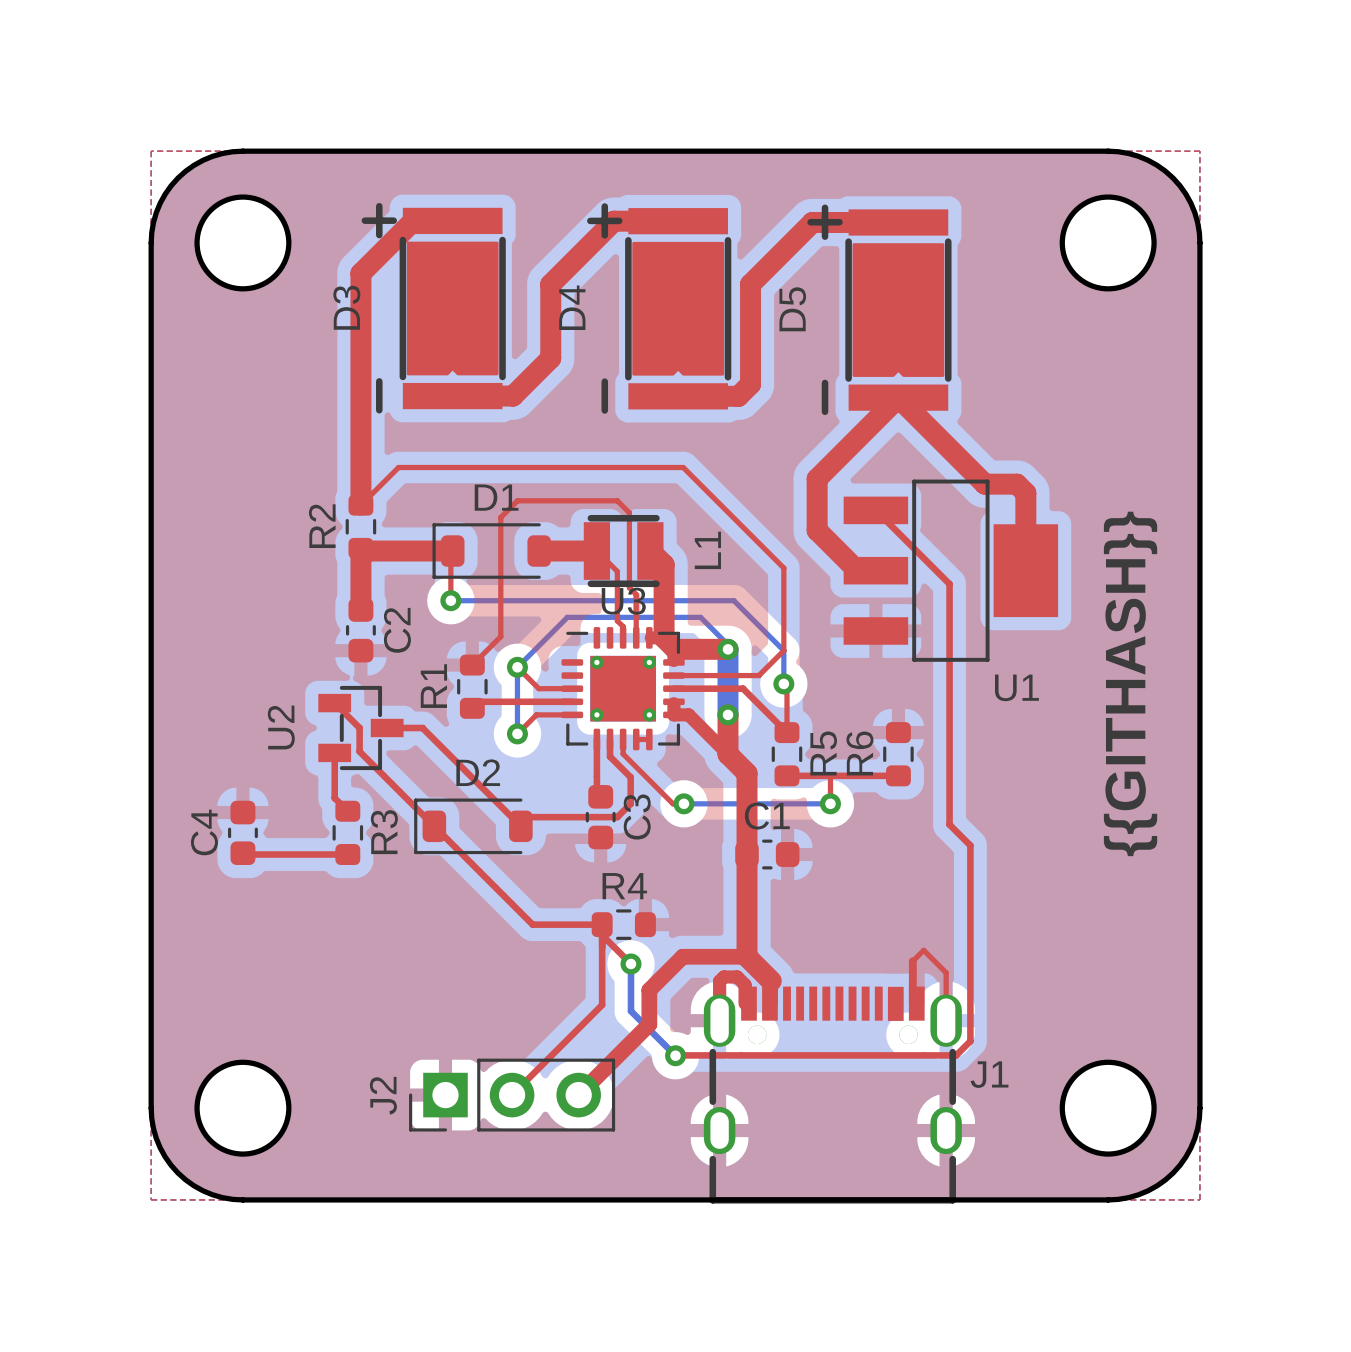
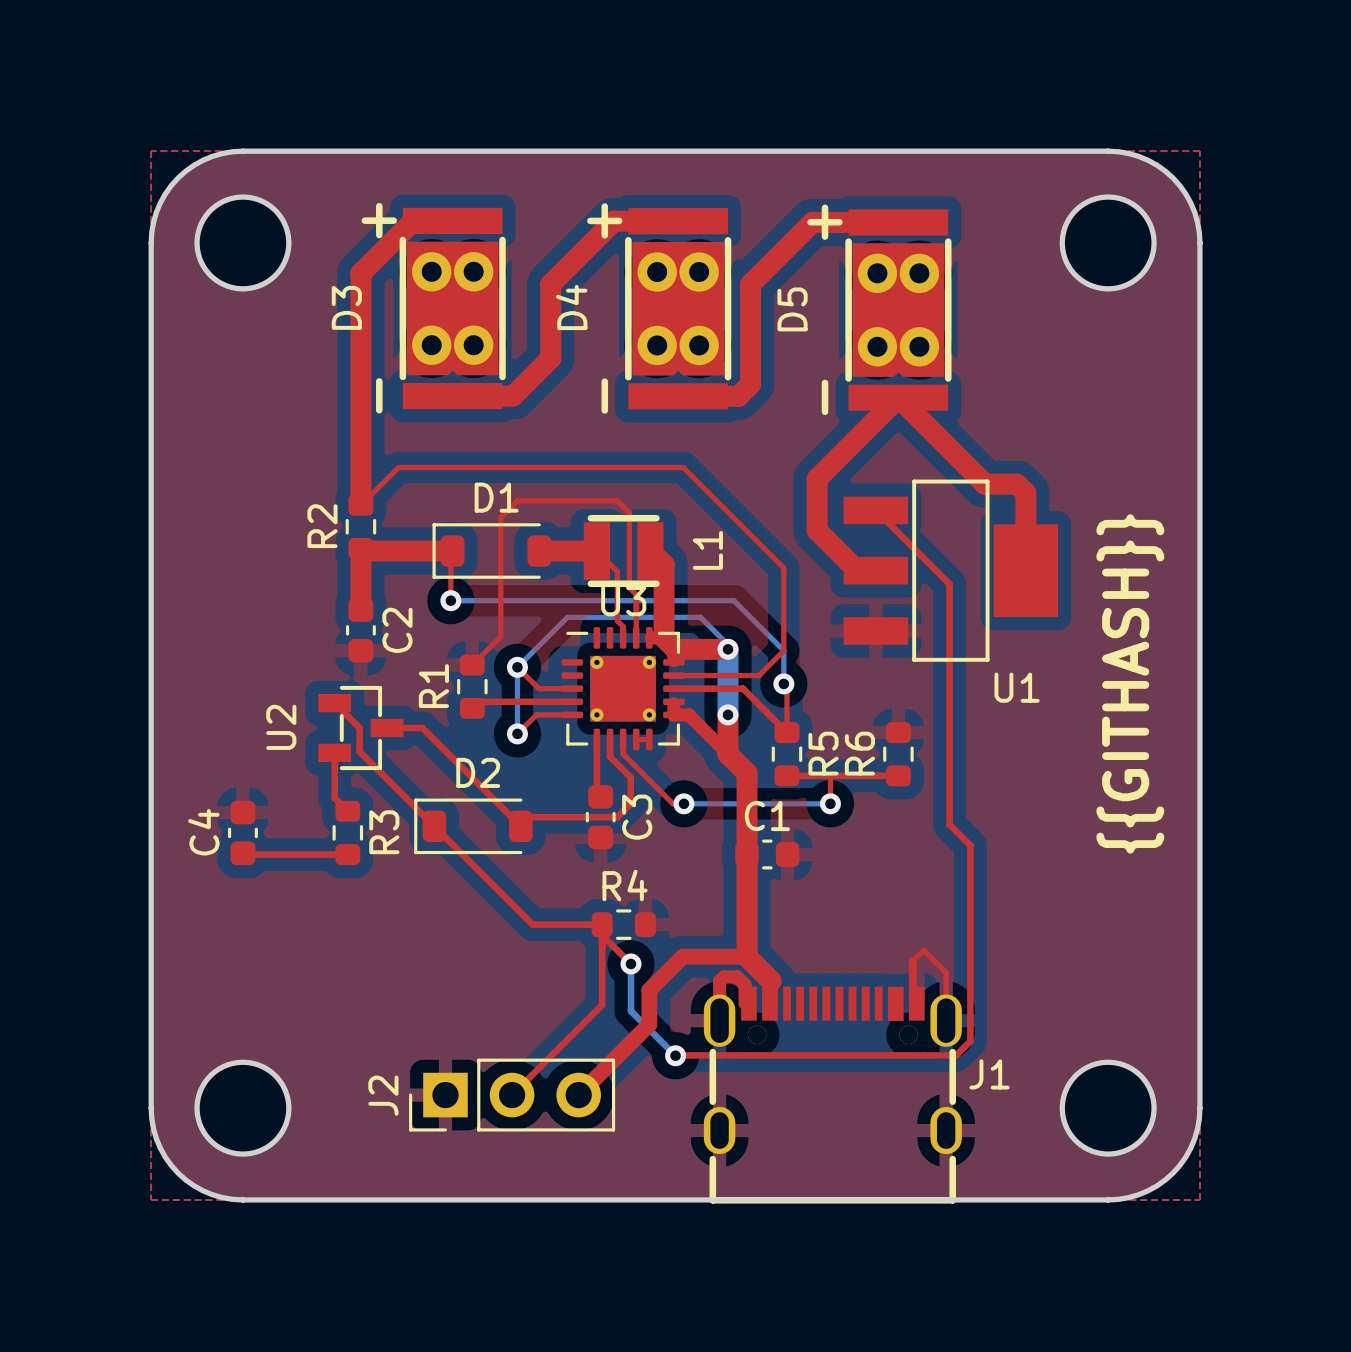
D3 footprint: [361, 202, 506, 414] -> [361, 202, 506, 414]
D4 footprint: [587, 203, 732, 414] -> [587, 203, 732, 414]
D5 footprint: [807, 204, 952, 416] -> [807, 204, 952, 416]

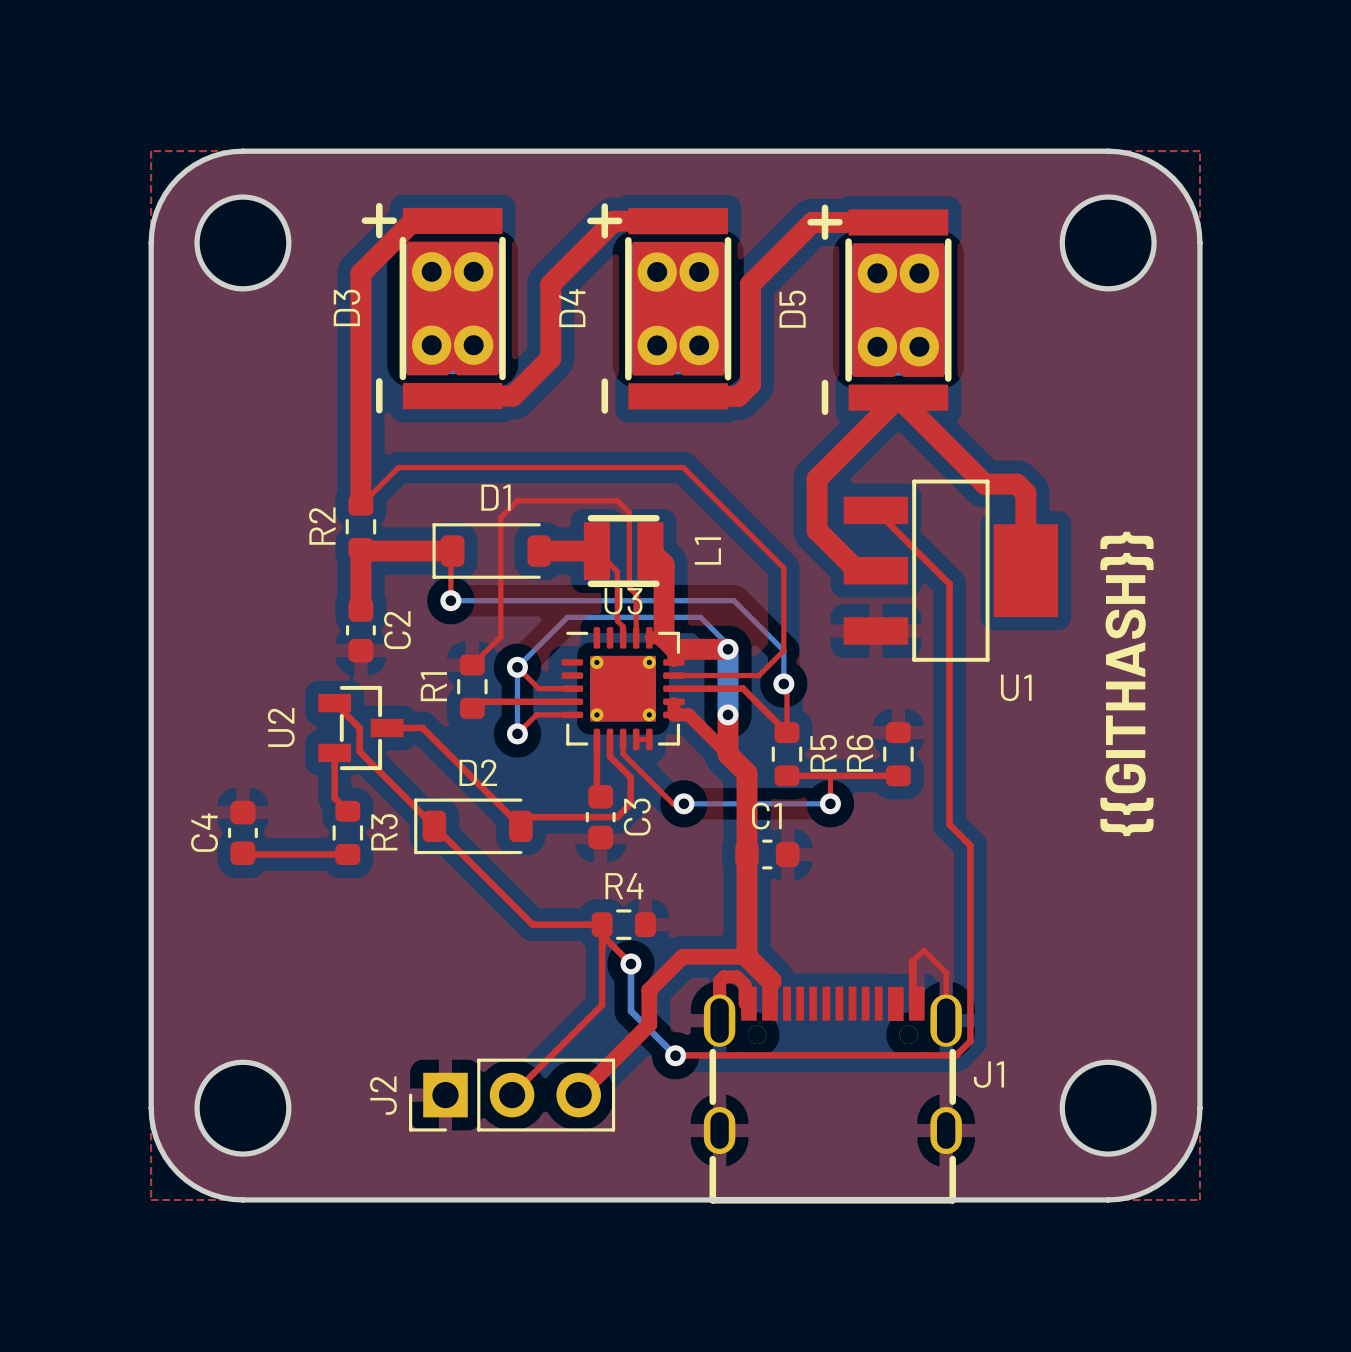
D3 footprint: [361, 202, 506, 414] -> [361, 202, 506, 414]
D4 footprint: [587, 203, 732, 414] -> [587, 203, 732, 414]
D5 footprint: [807, 204, 952, 416] -> [807, 204, 952, 416]

